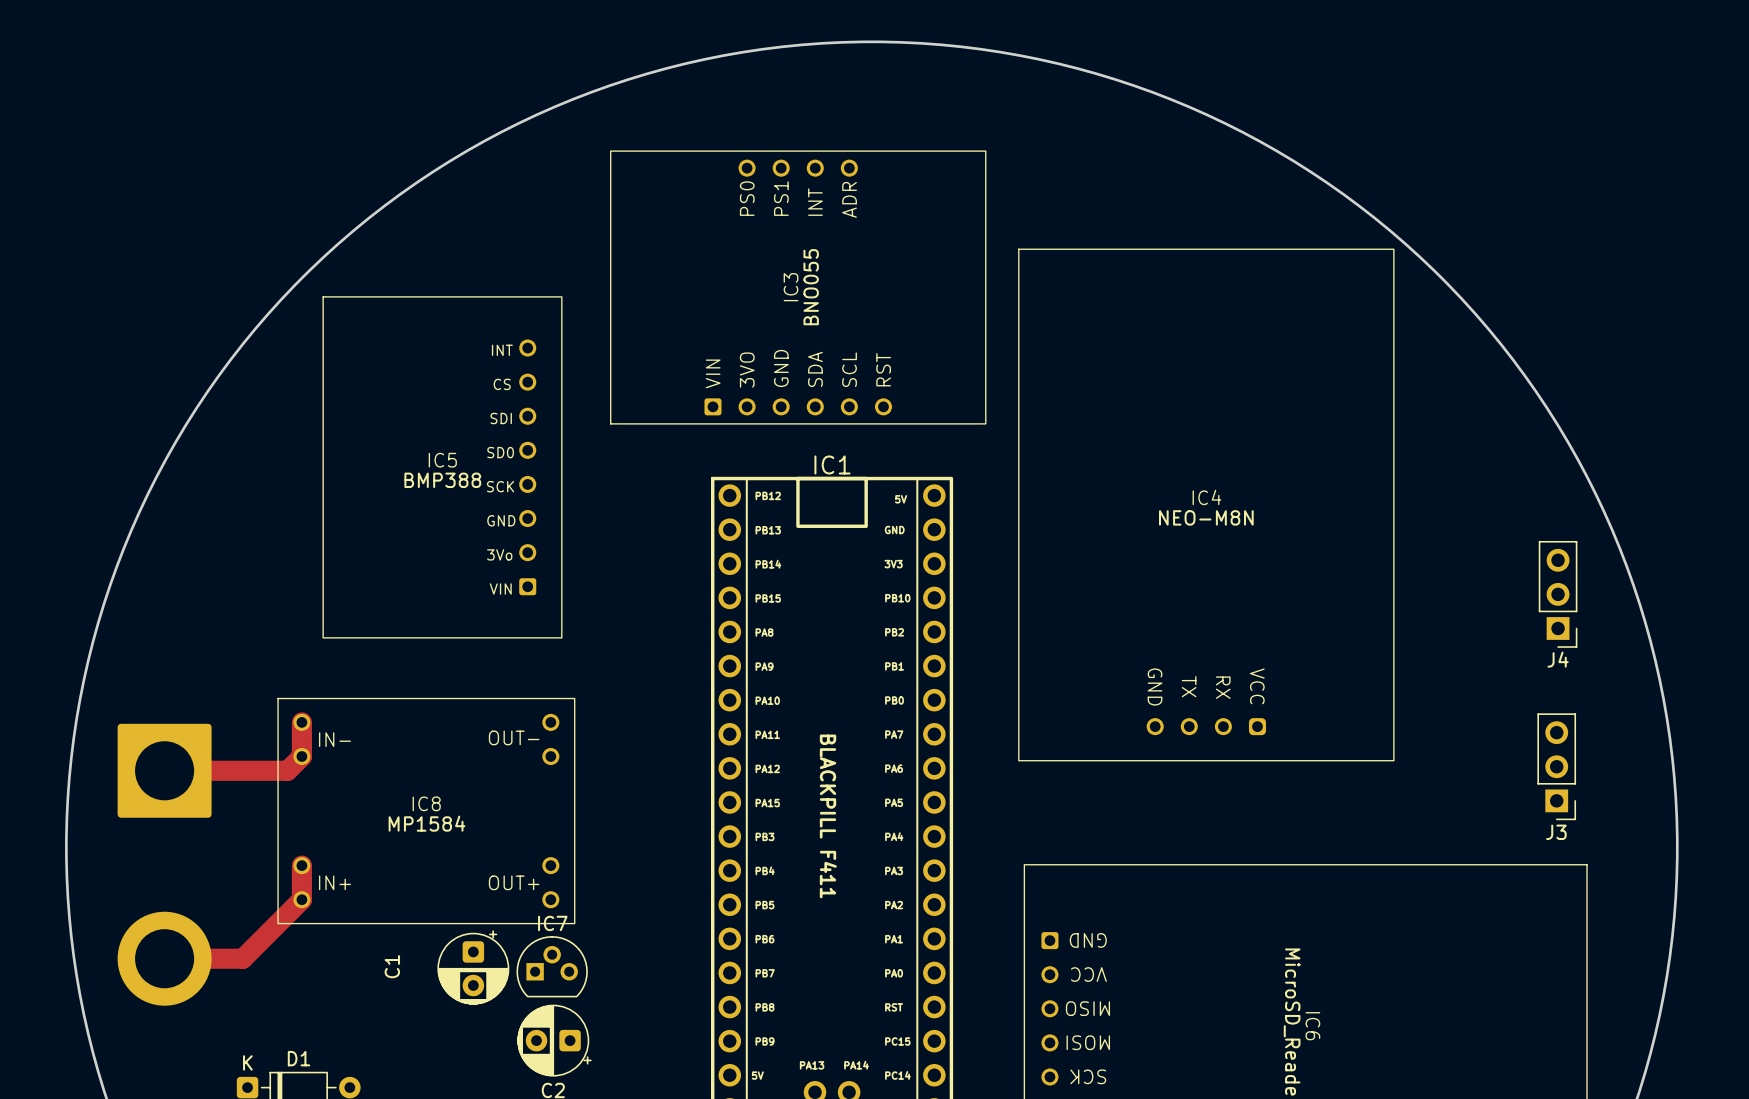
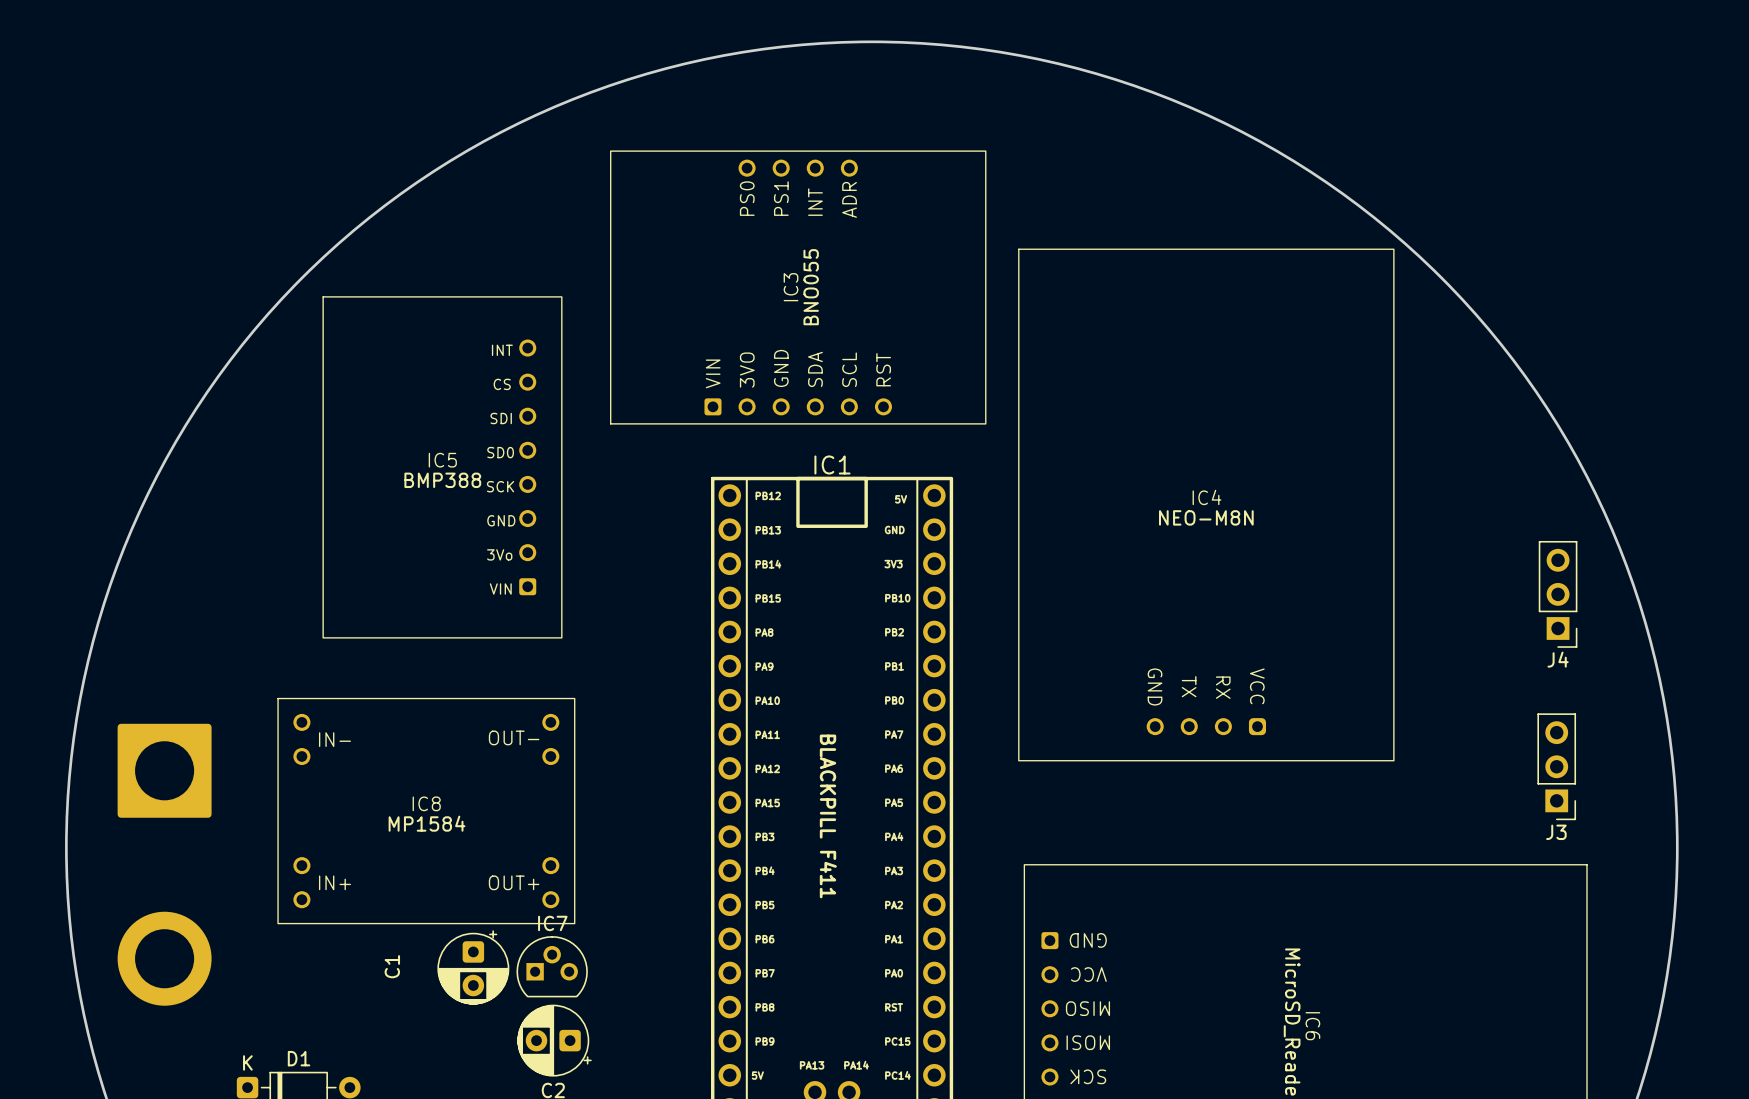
track: (301, 722) (301, 756) (287, 770) (164, 770) -> none
track: (301, 865) (301, 899) (242, 958) (164, 958) -> none

